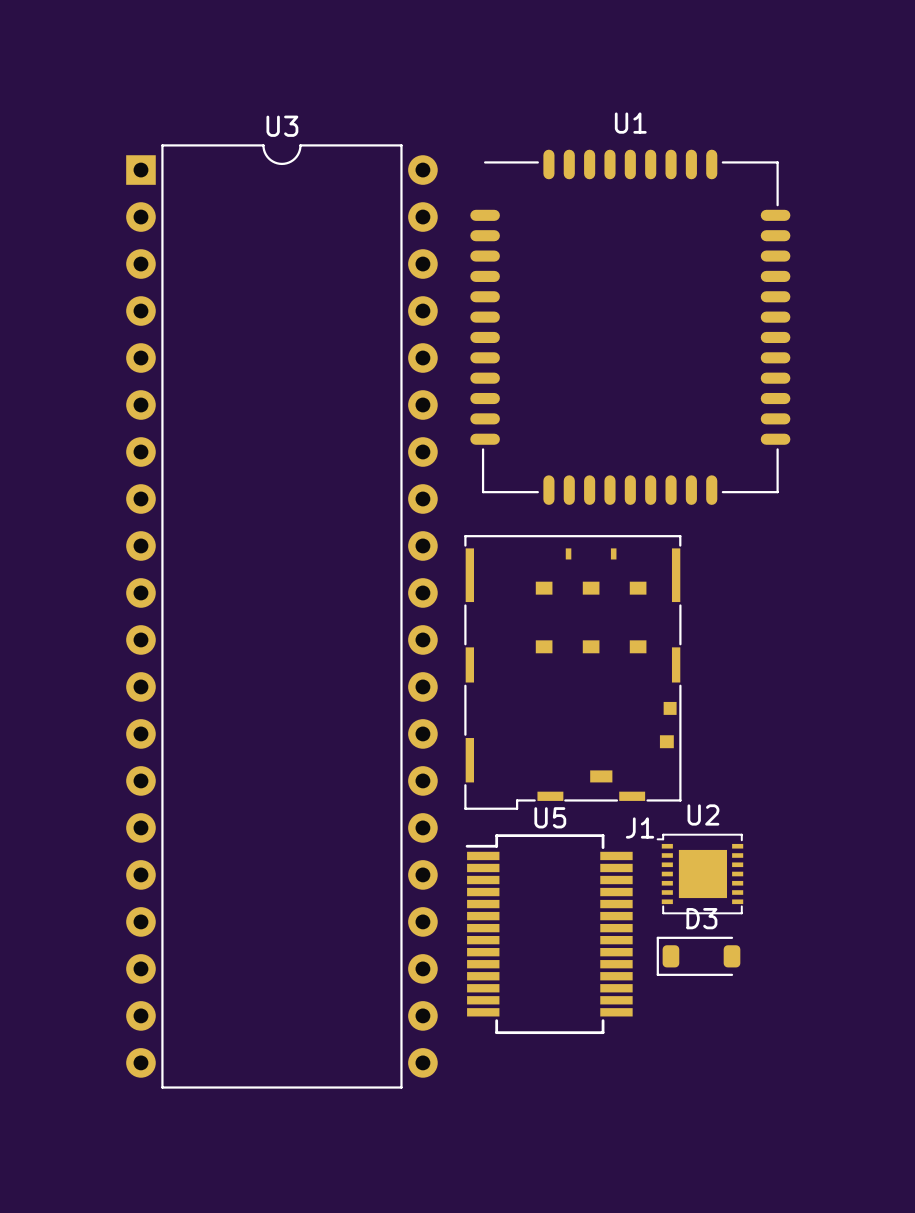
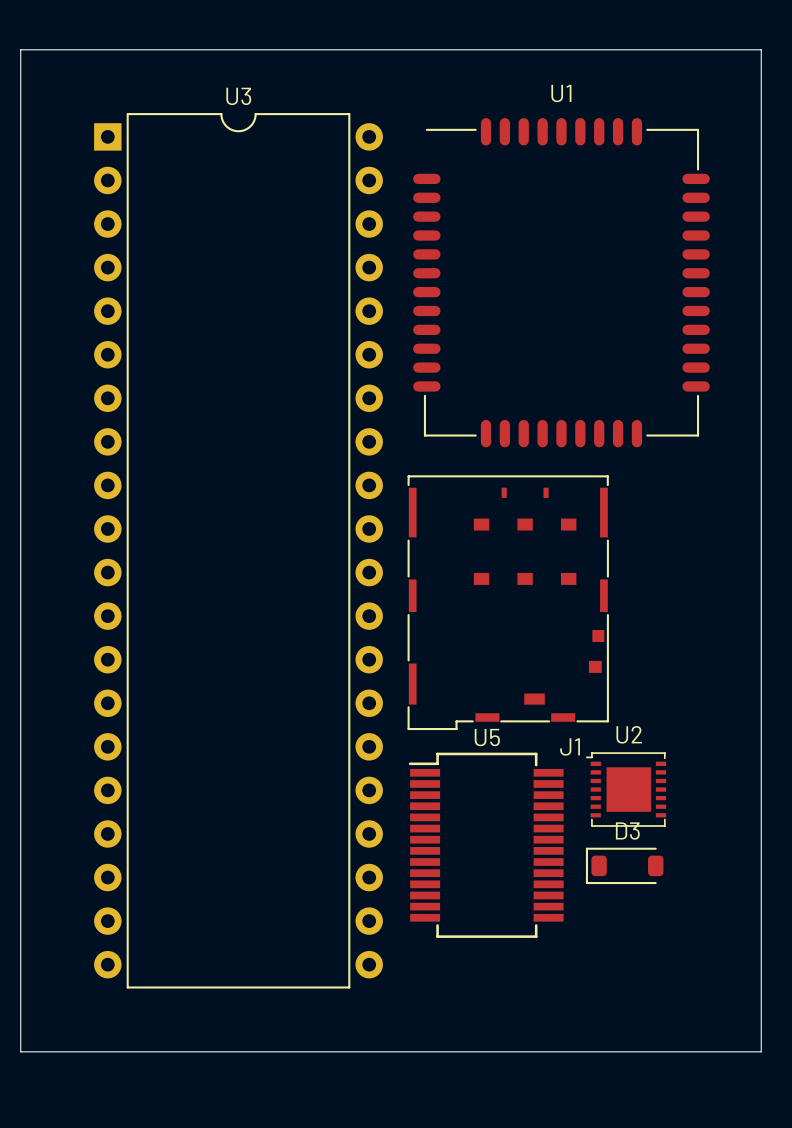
board edge: none -> (20, 49) (761, 49) (761, 1051) (20, 1051) (20, 49)

